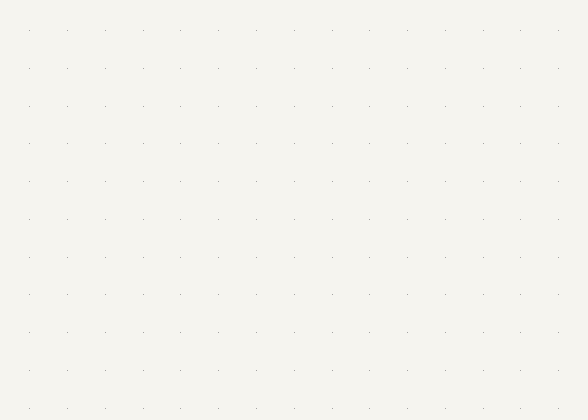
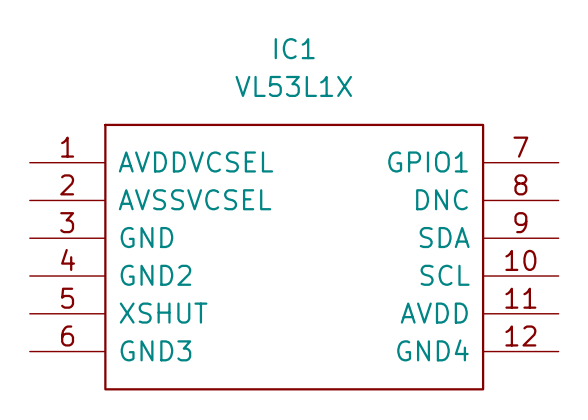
IC1: none -> VL53L1X (294, 257)

